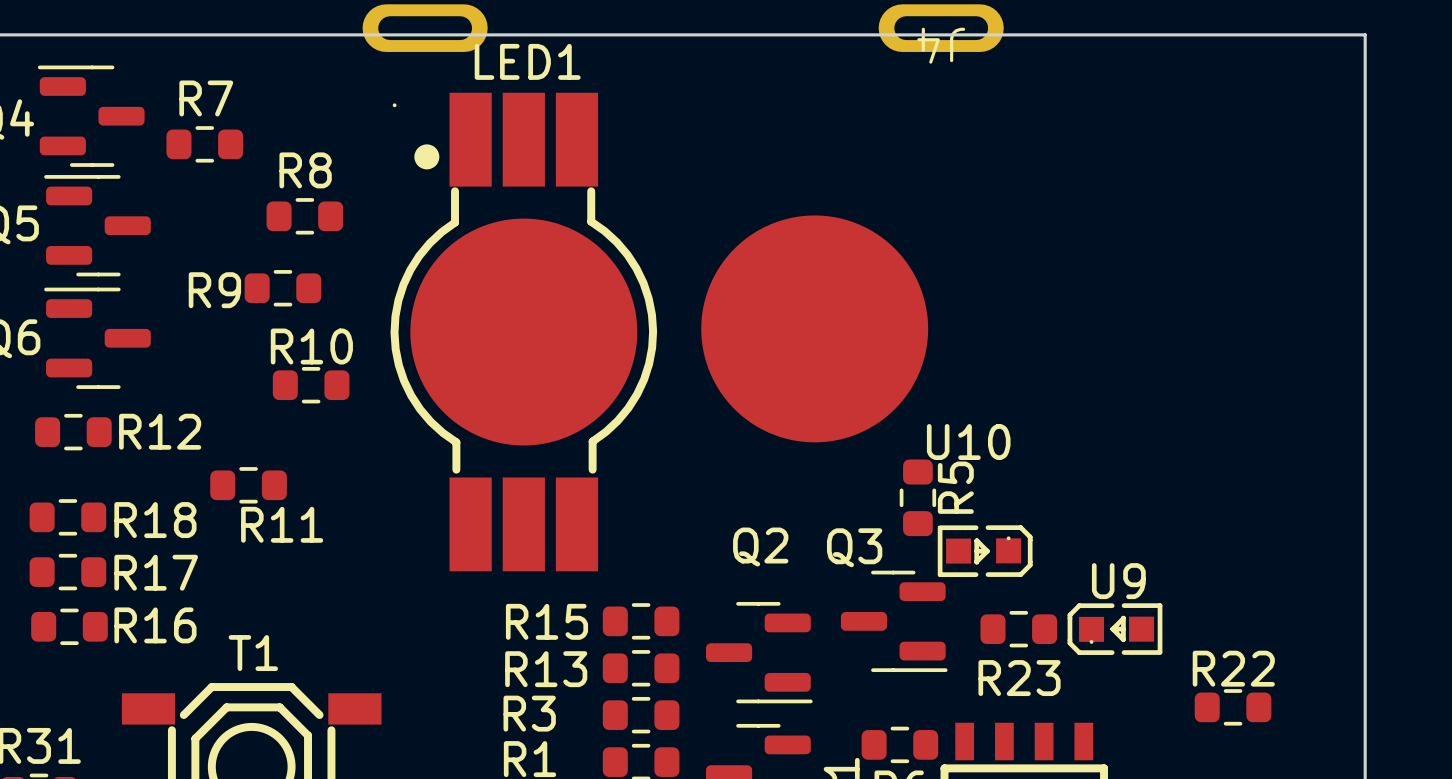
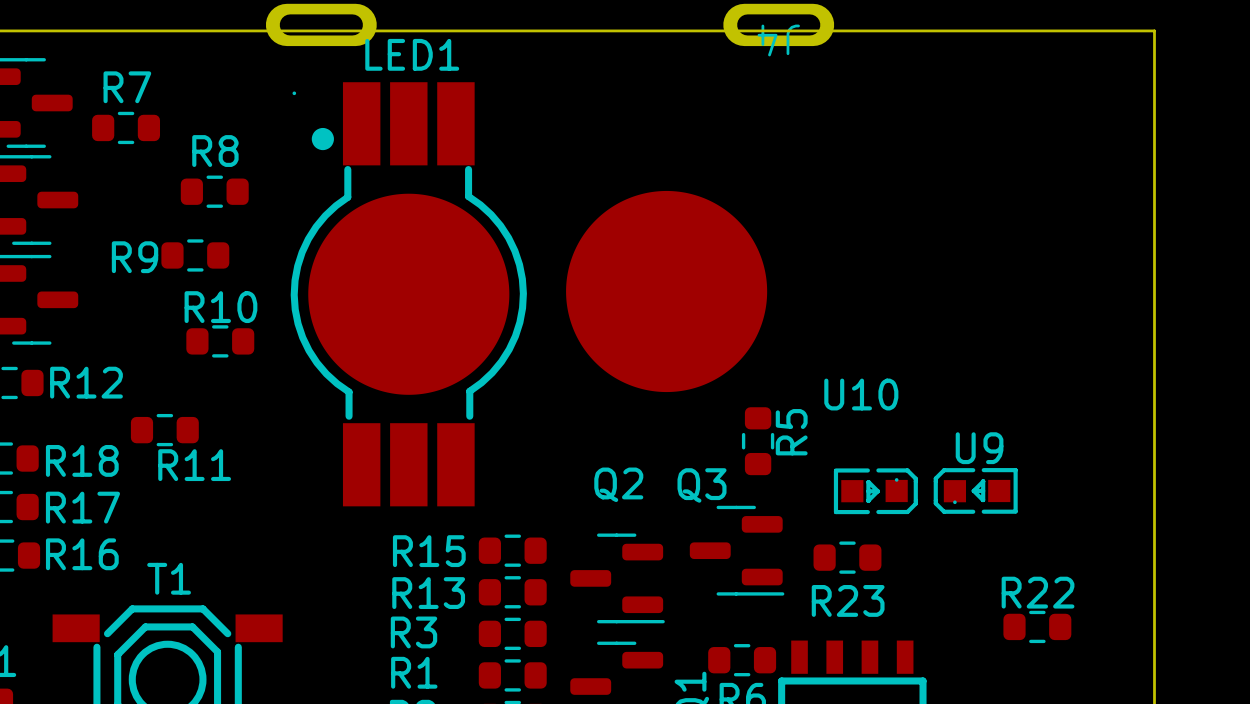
U10 position: (985, 551) -> (875, 491)
U9 position: (1115, 629) -> (975, 490)

